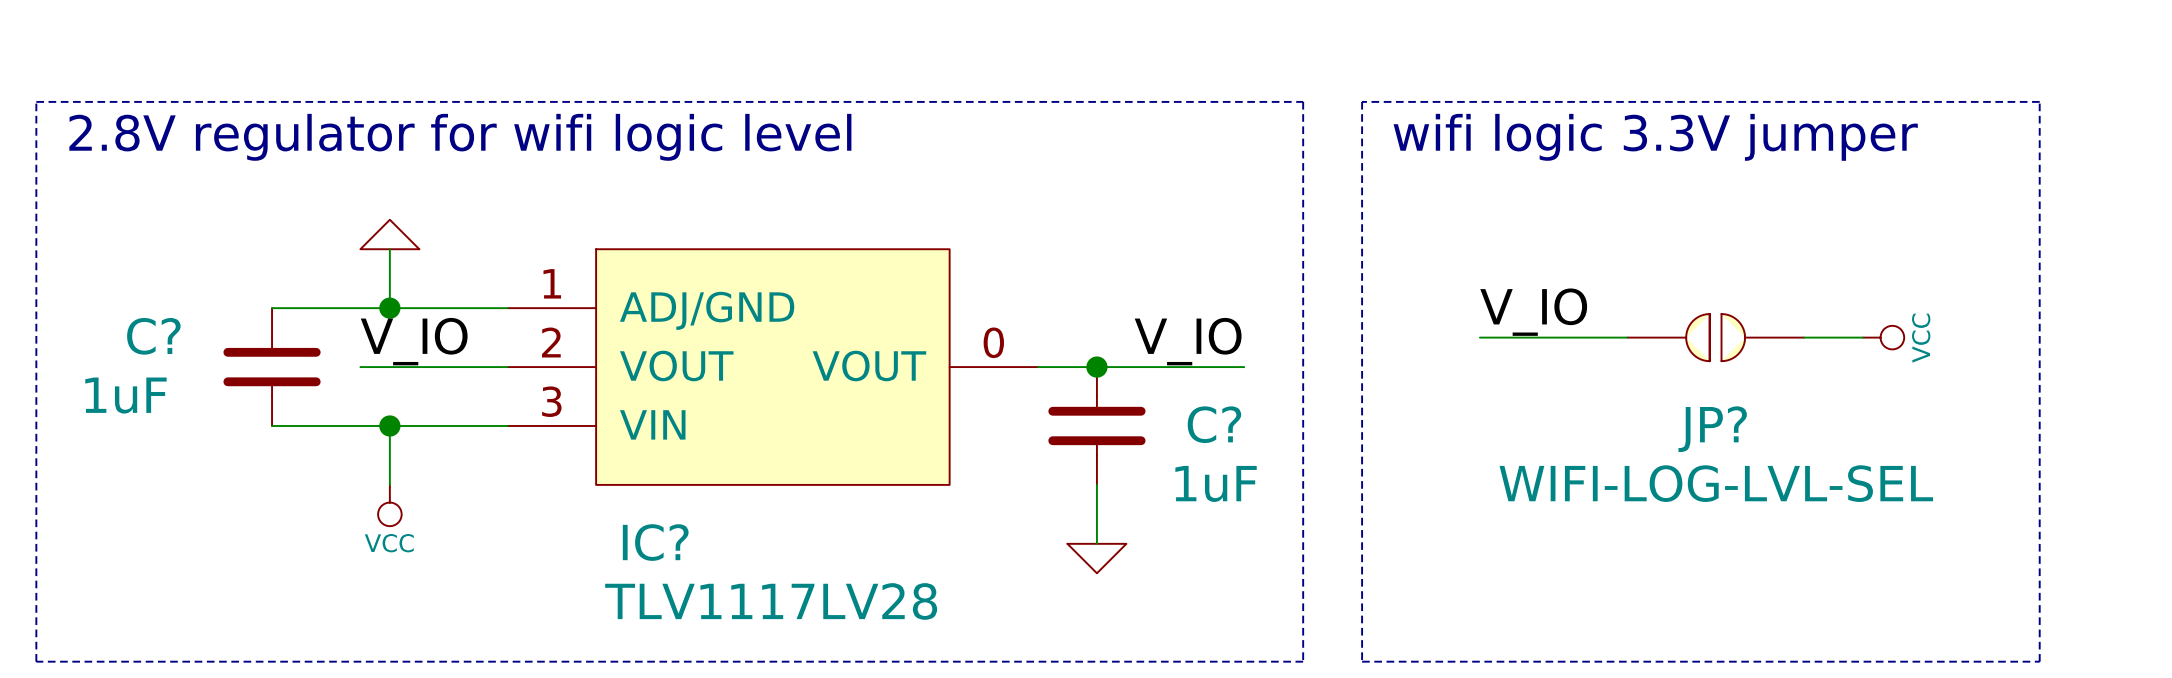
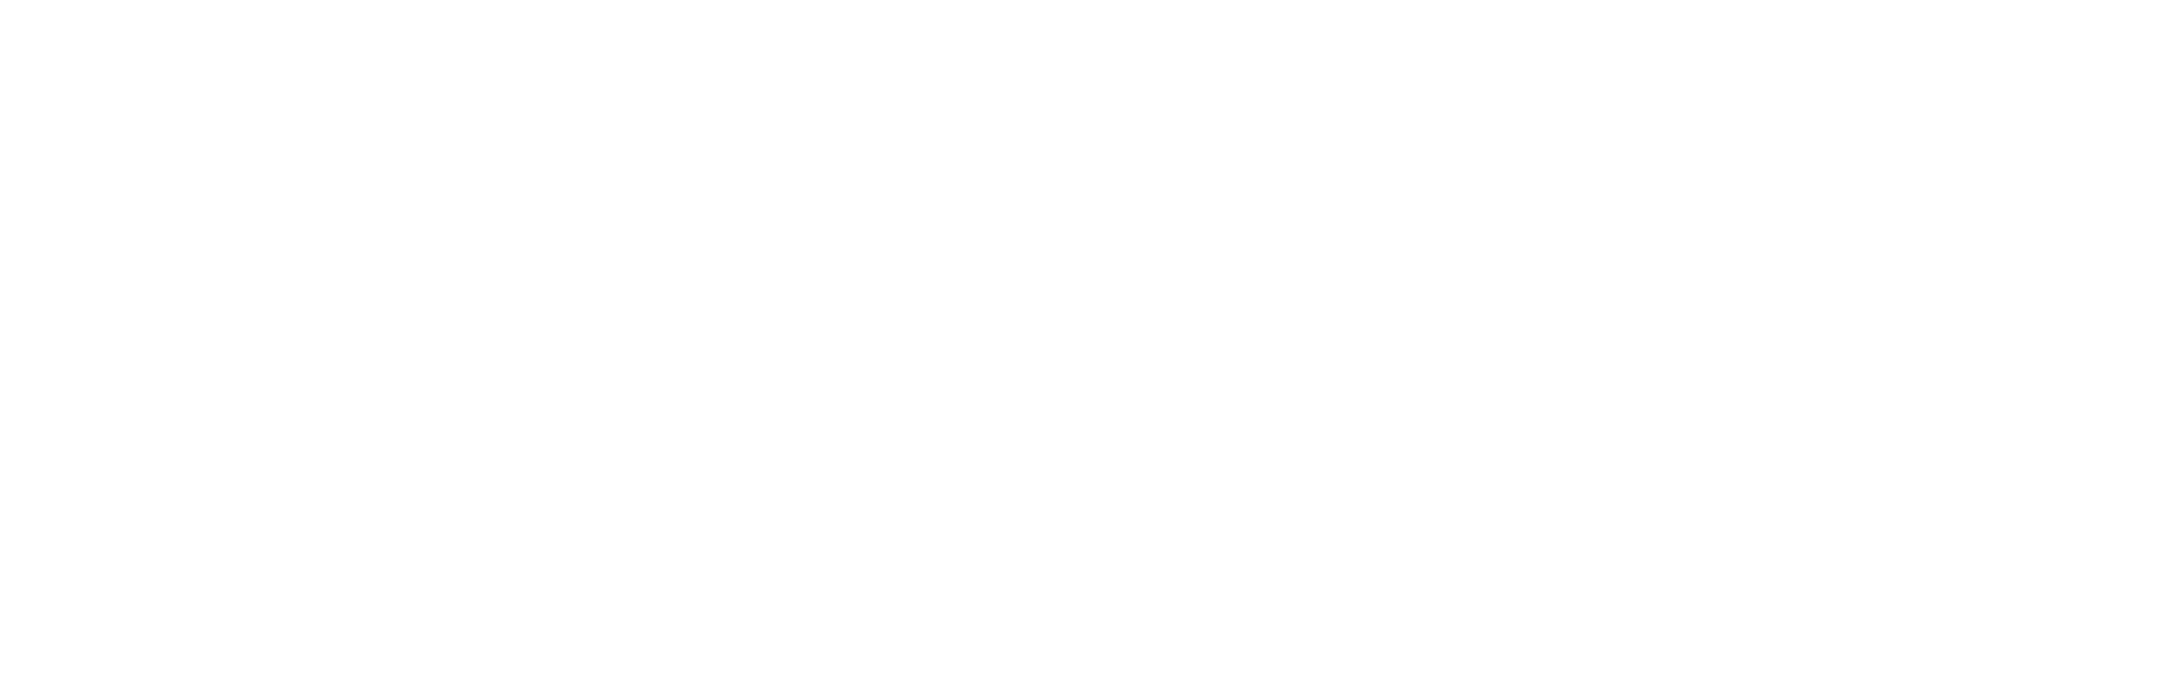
line: (36, 101) (1303, 101) (1303, 661) (36, 661) (36, 101) -> none
line: (1362, 101) (2039, 101) (2039, 661) (1362, 661) (1362, 101) -> none
text: 2.8V regulator for wifi logic level (460, 137) -> none
text: wifi logic 3.3V jumper (1655, 137) -> none
power symbol: (389, 234) -> none
wire: (389, 249) (389, 308) -> none
wire: (272, 308) (507, 308) -> none
junction: (389, 308) -> none
label: V_IO (1533, 312) -> none
wire: (1479, 337) (1627, 337) -> none
JP?: WIFI-LOG-LVL-SEL (1715, 337) -> none
wire: (1804, 337) (1862, 337) -> none
power symbol: VCC (1883, 337) -> none
label: V_IO (414, 341) -> none
label: V_IO (1188, 341) -> none
C?: 1uF (272, 367) -> none
wire: (360, 367) (507, 367) -> none
IC?: TLV1117LV28 (772, 367) -> none
wire: (1038, 367) (1244, 367) -> none
junction: (1096, 367) -> none
wire: (272, 425) (507, 425) -> none
wire: (389, 425) (389, 484) -> none
junction: (389, 425) -> none
C?: 1uF (1096, 425) -> none
wire: (1096, 484) (1096, 543) -> none
power symbol: VCC (389, 505) -> none
power symbol: (1096, 558) -> none

